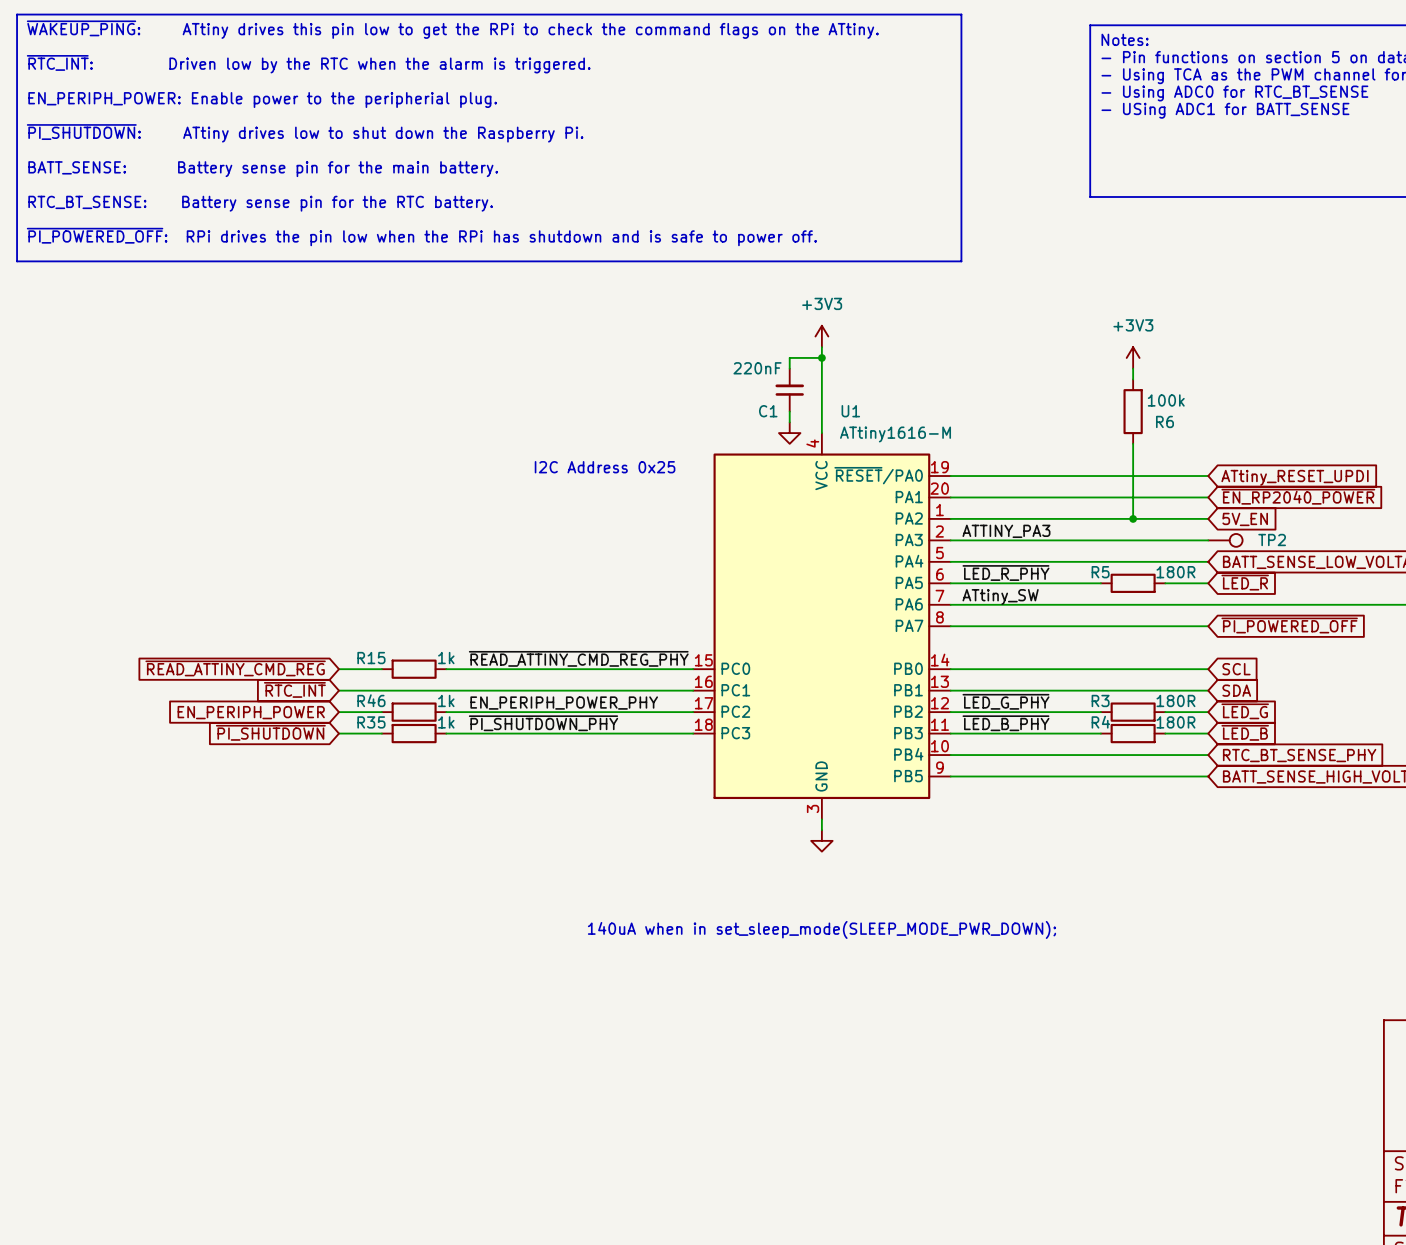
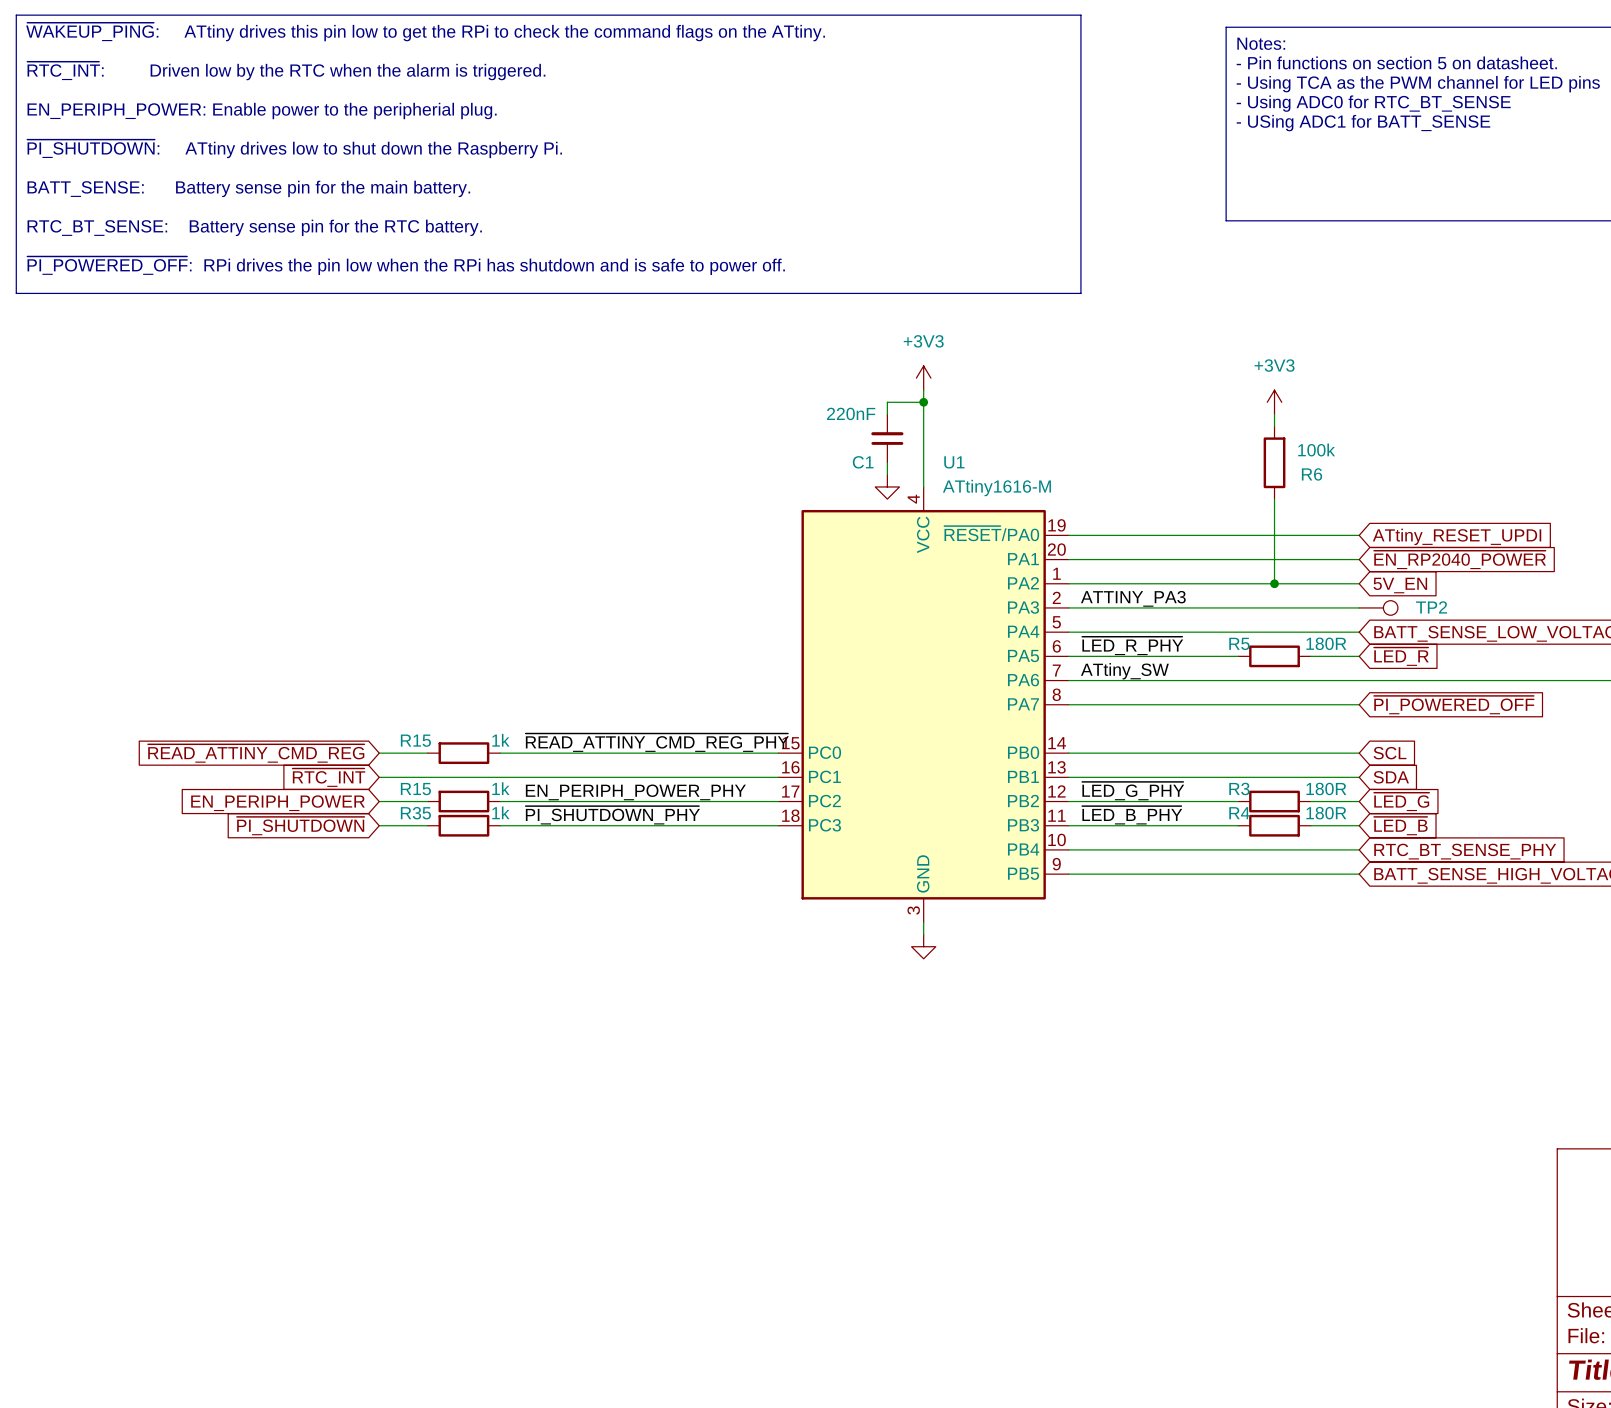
text: I2C Address 0x25 (605, 467) -> none
R46 name: R46 (371, 700) -> R15 (415, 789)
text: 140uA when in set_sleep_mode(SLEEP_MODE_PWR_DOWN); (821, 929) -> none

